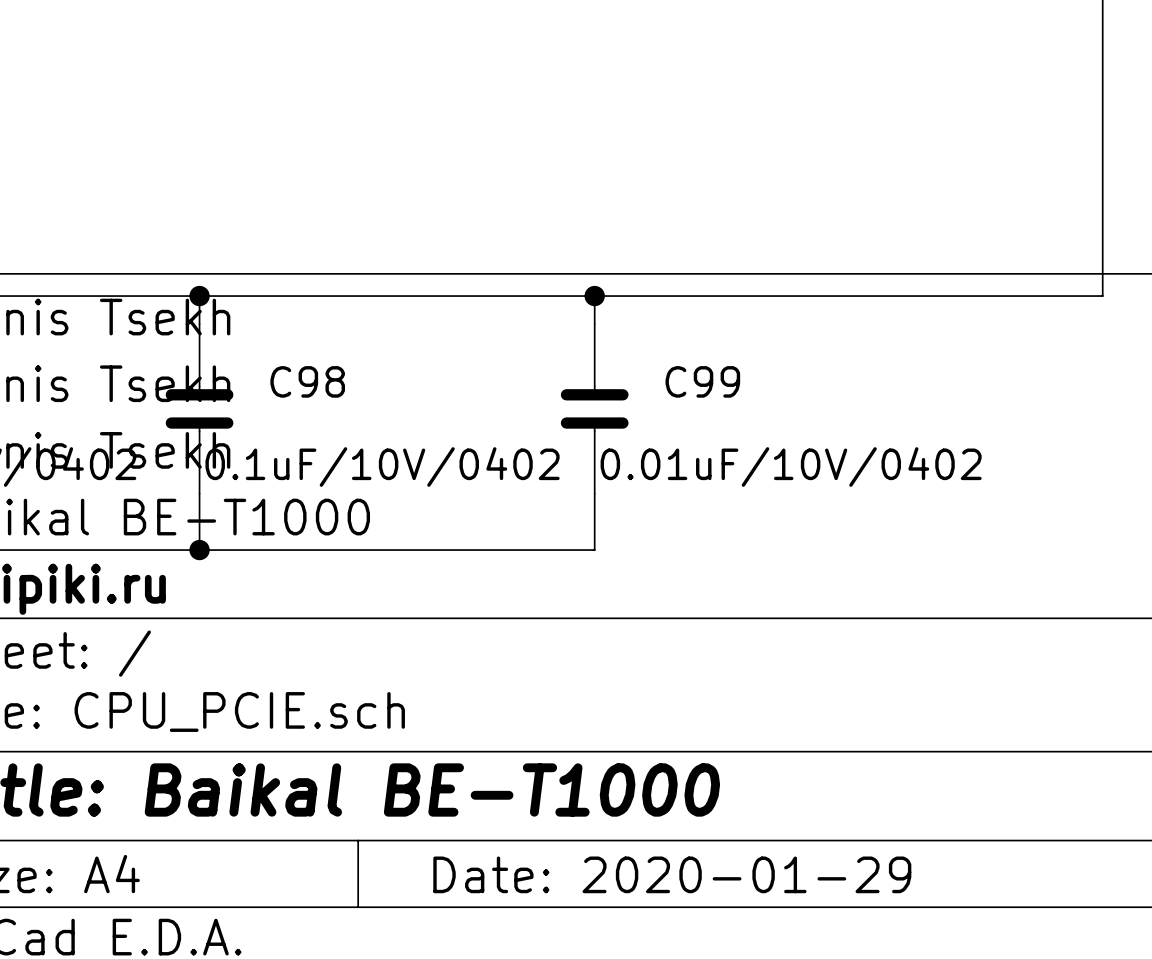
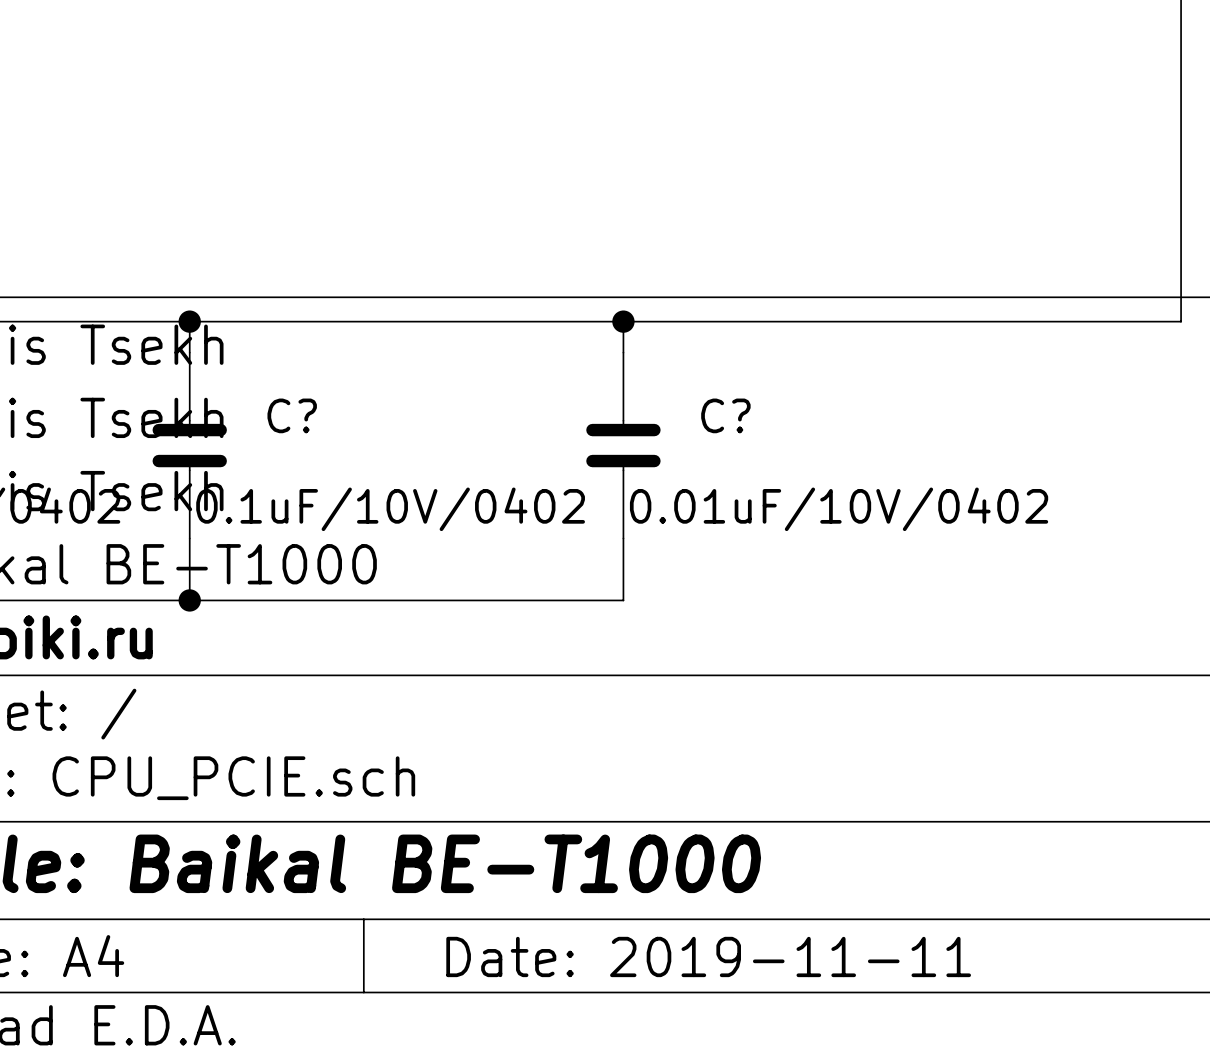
C98 name: C98 (307, 381) -> C? (292, 415)
C99 name: C99 (702, 381) -> C? (725, 415)
title block: Date: 2020-01-29 (672, 874) -> Date: 2019-11-11 (708, 956)

